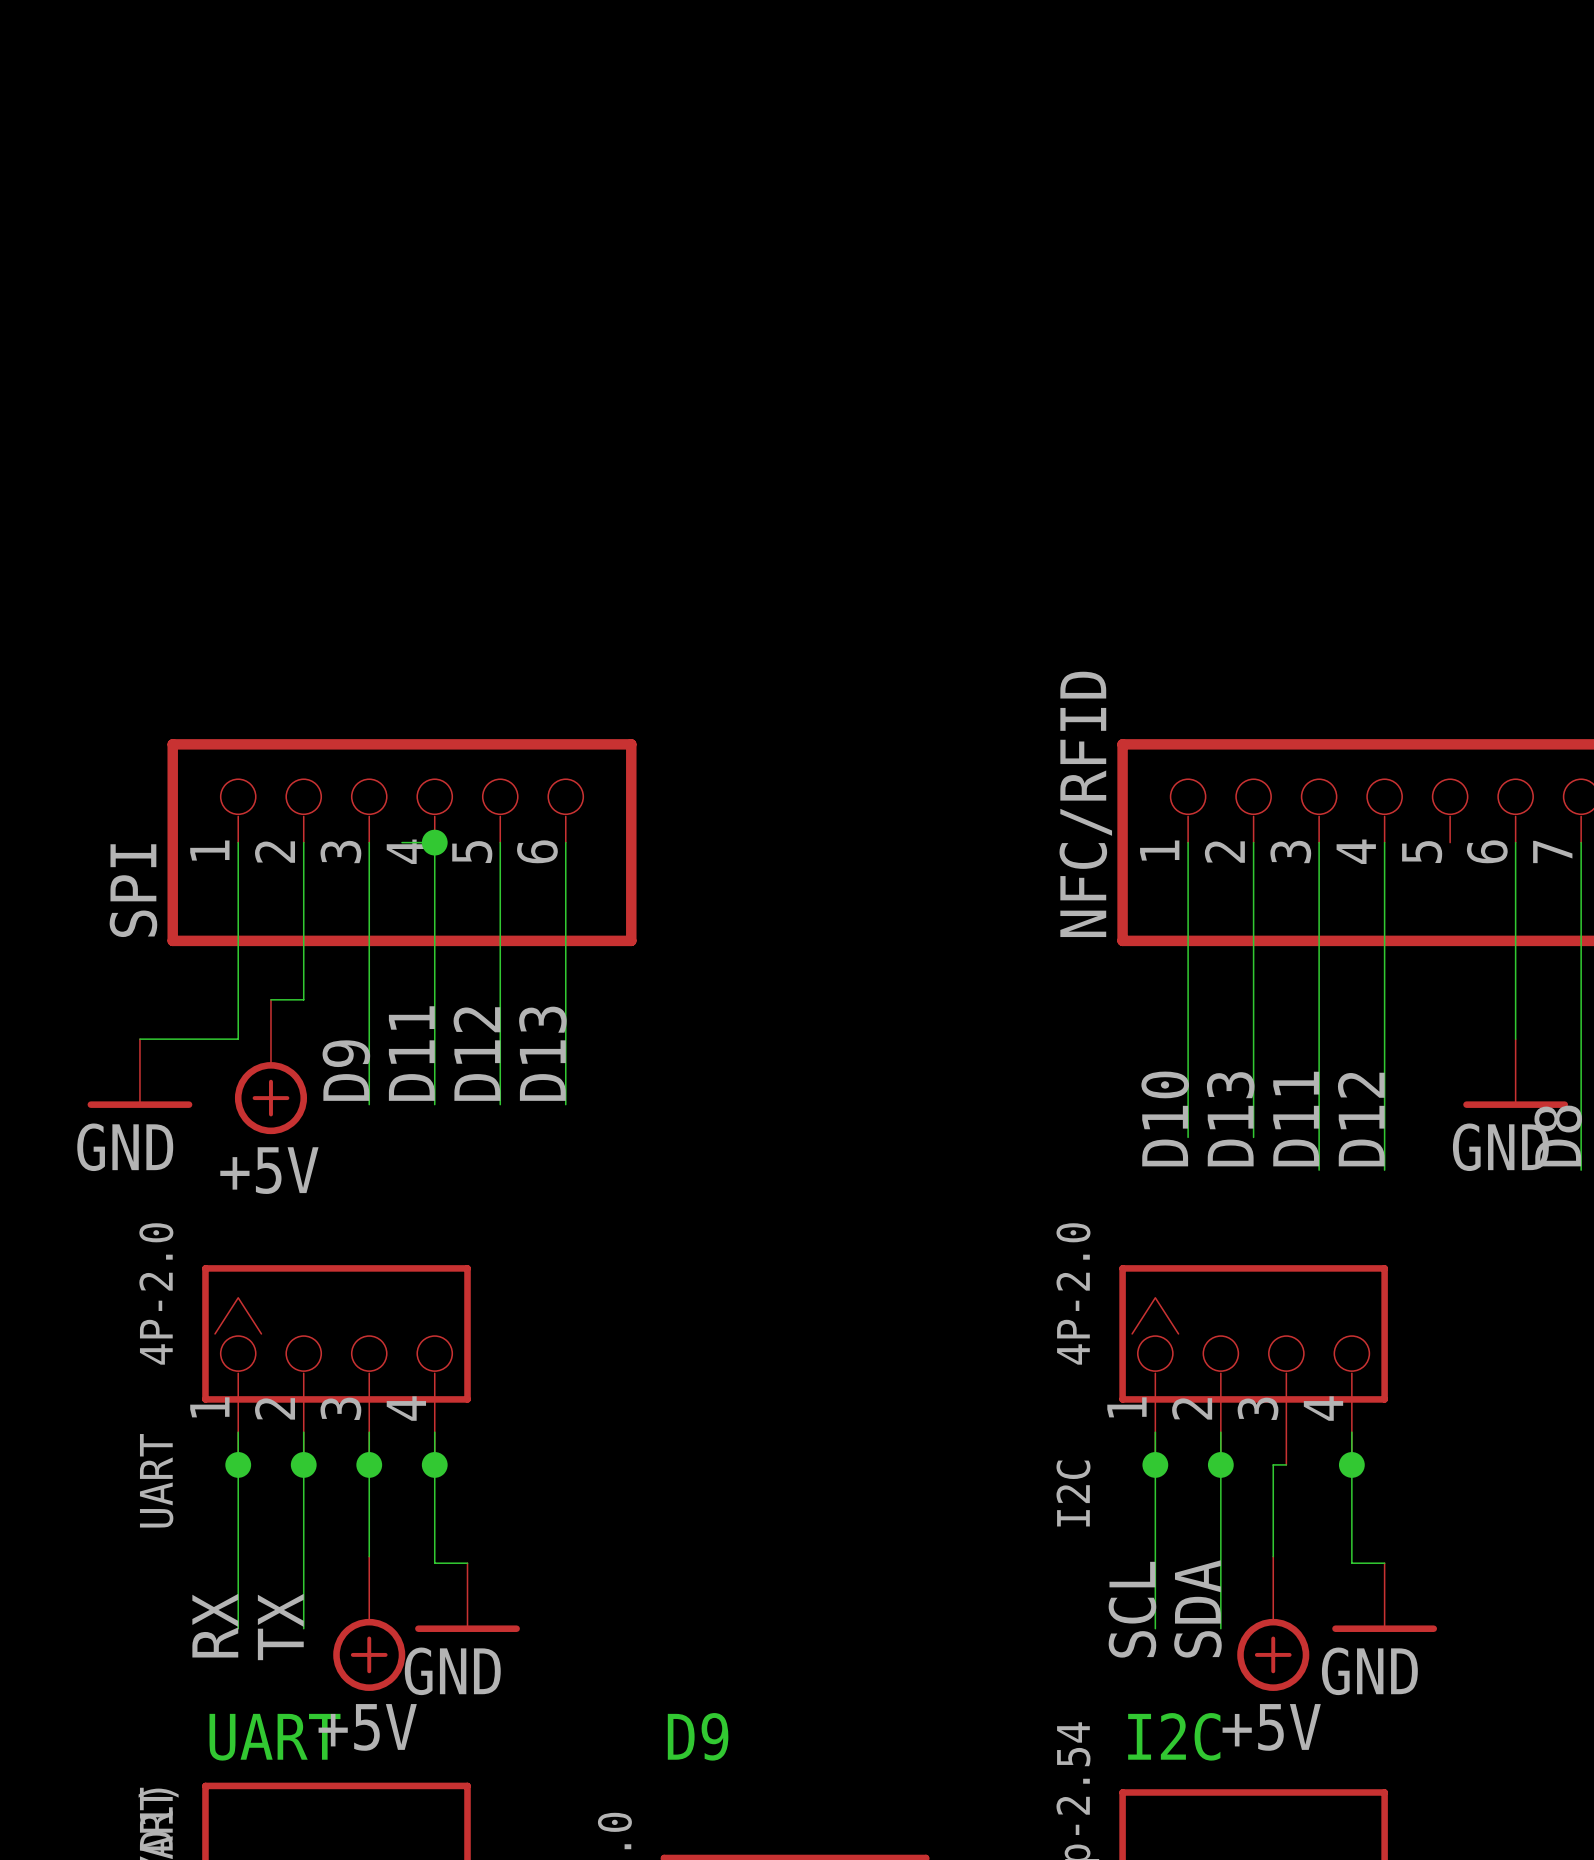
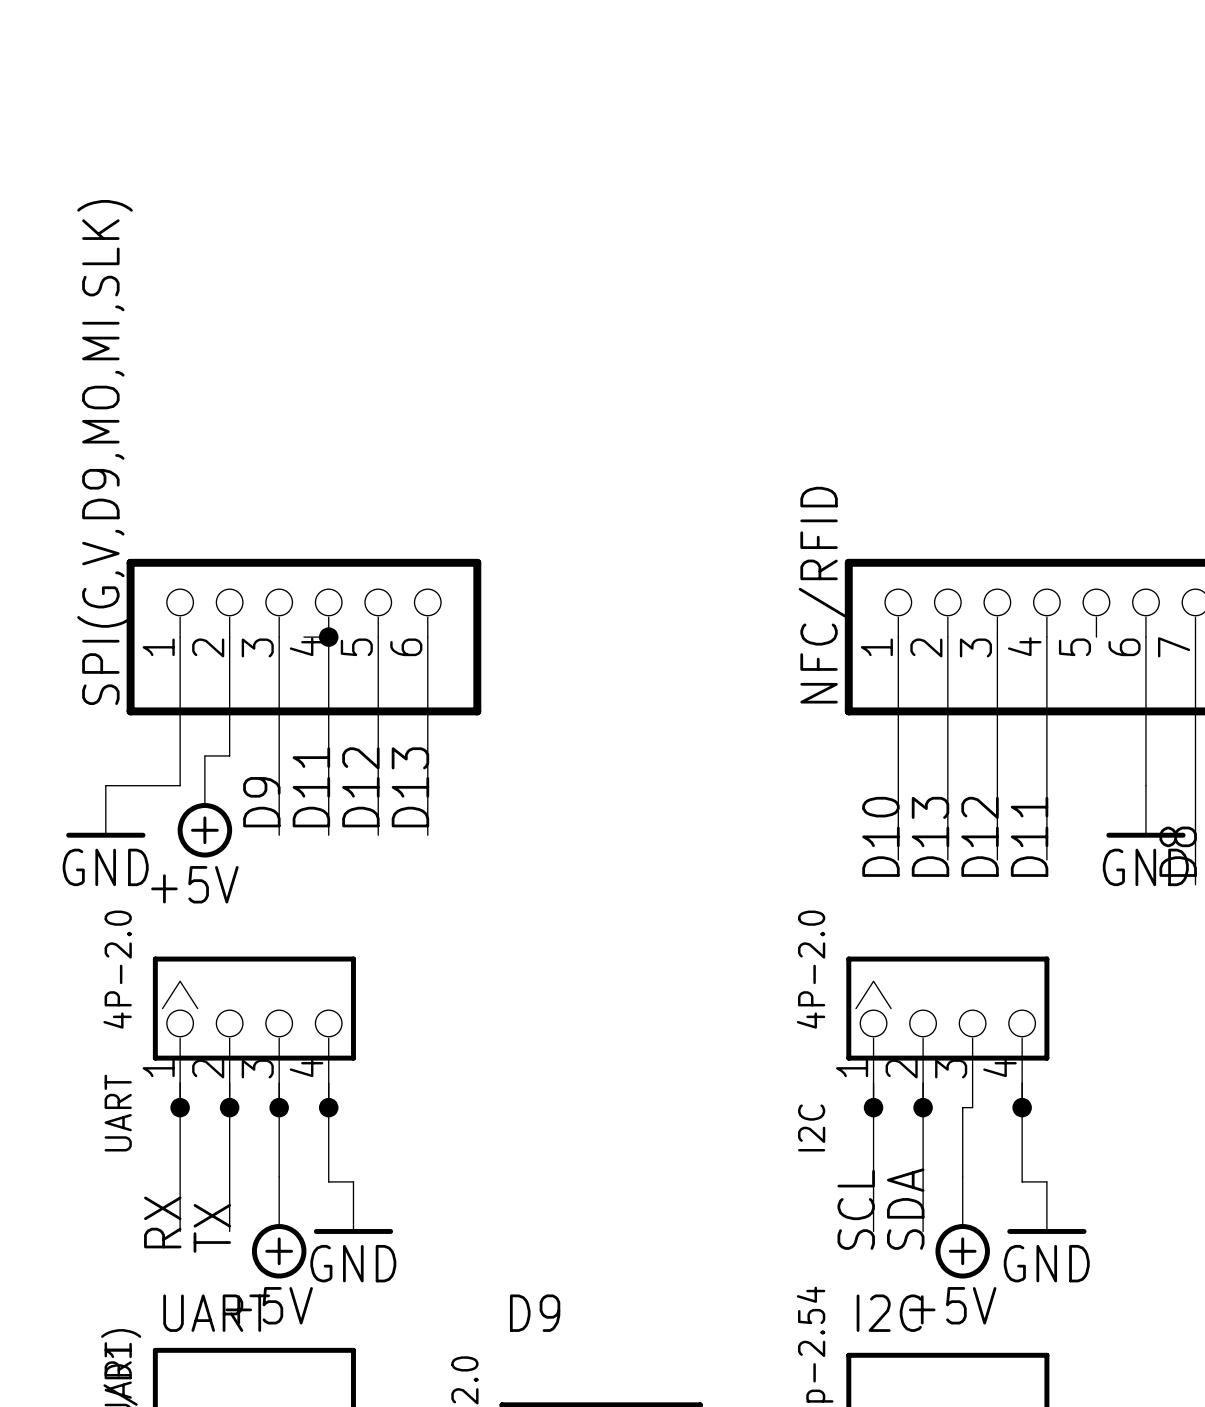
SPI name: SPI (133, 890) -> SPI(G,V,D9,MO,MI,SLK) (105, 452)
label: D11 (1296, 1119) -> D12 (980, 836)
label: D12 (1361, 1119) -> D11 (1029, 836)
wire: (1319, 1137) (1319, 1170) -> none
wire: (1384, 1137) (1384, 1170) -> none

